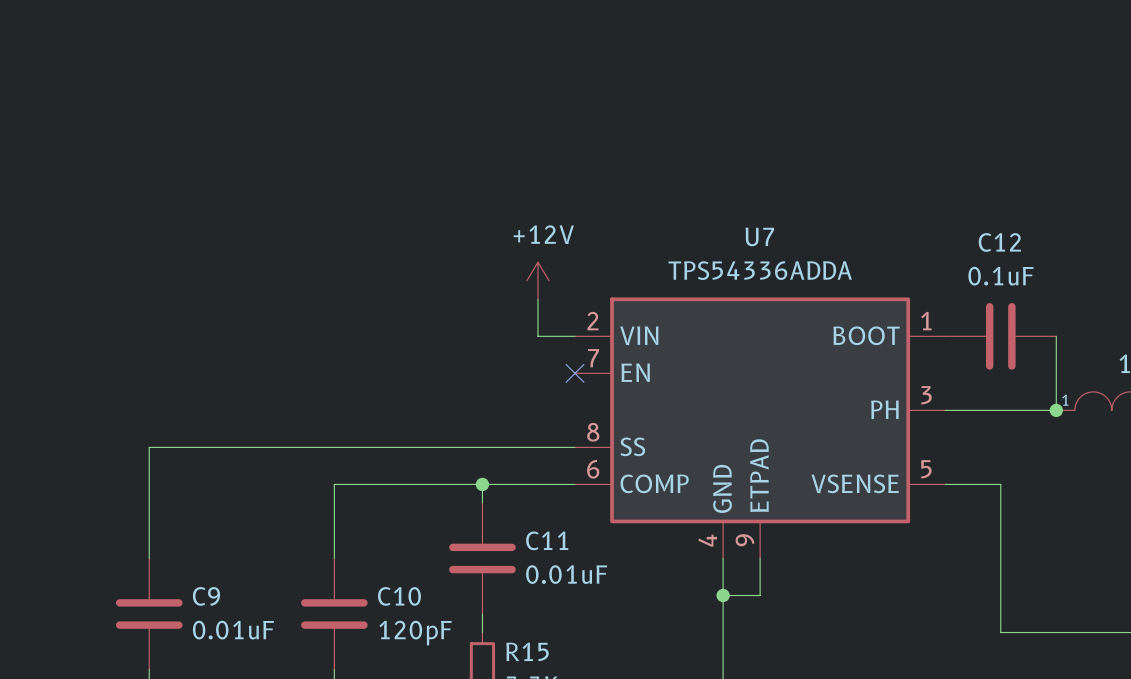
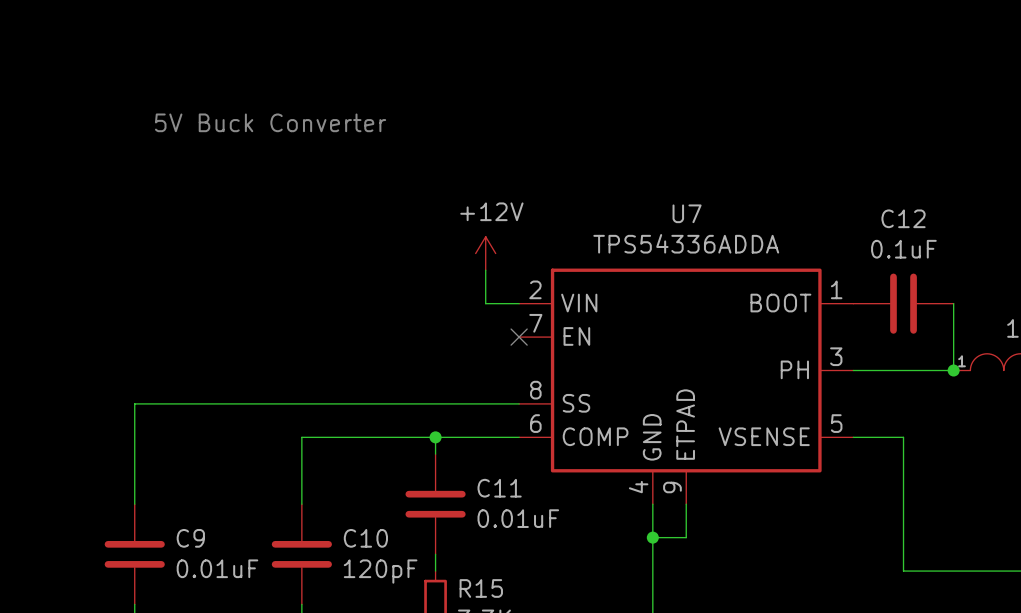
text: none -> 5V Buck Converter (270, 122)

